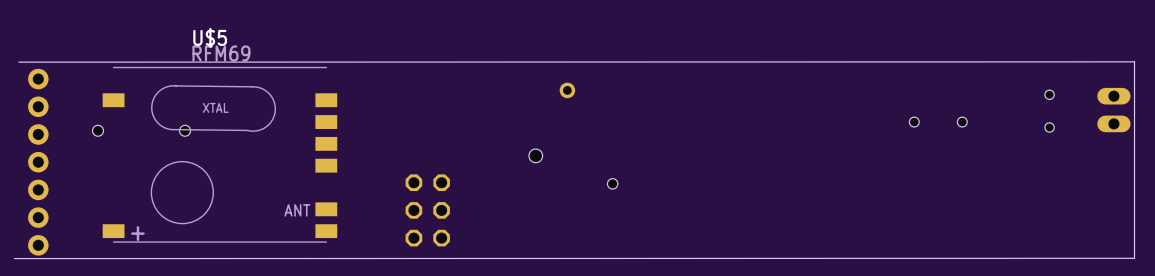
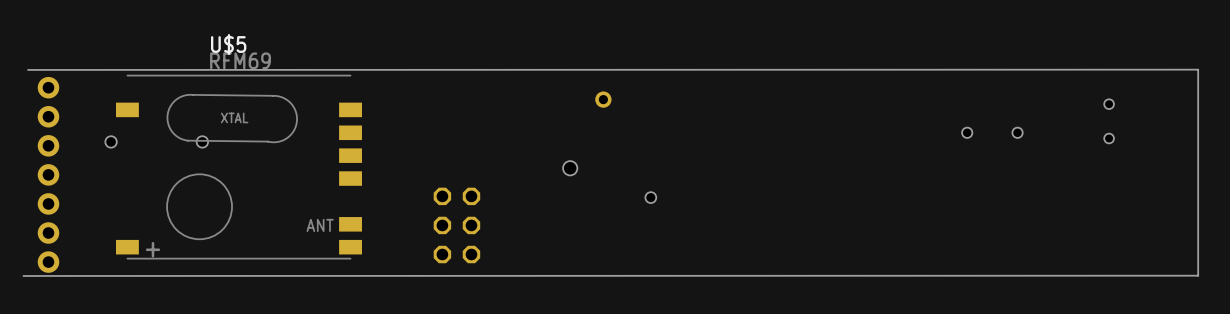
part: (1113, 110) -> none

